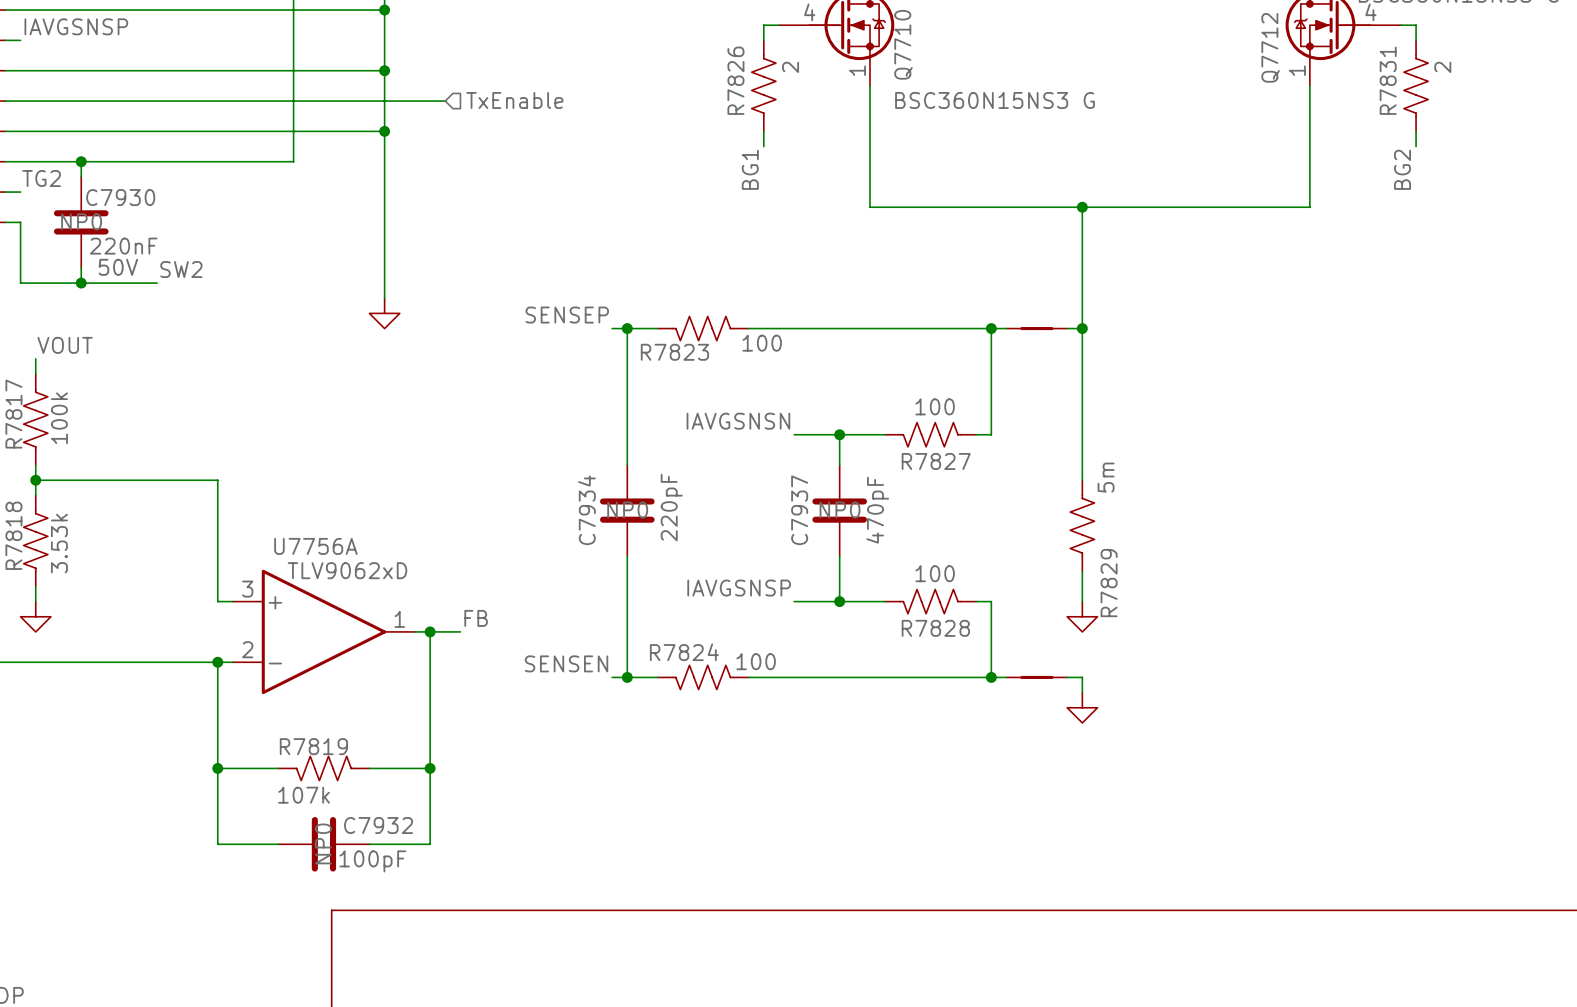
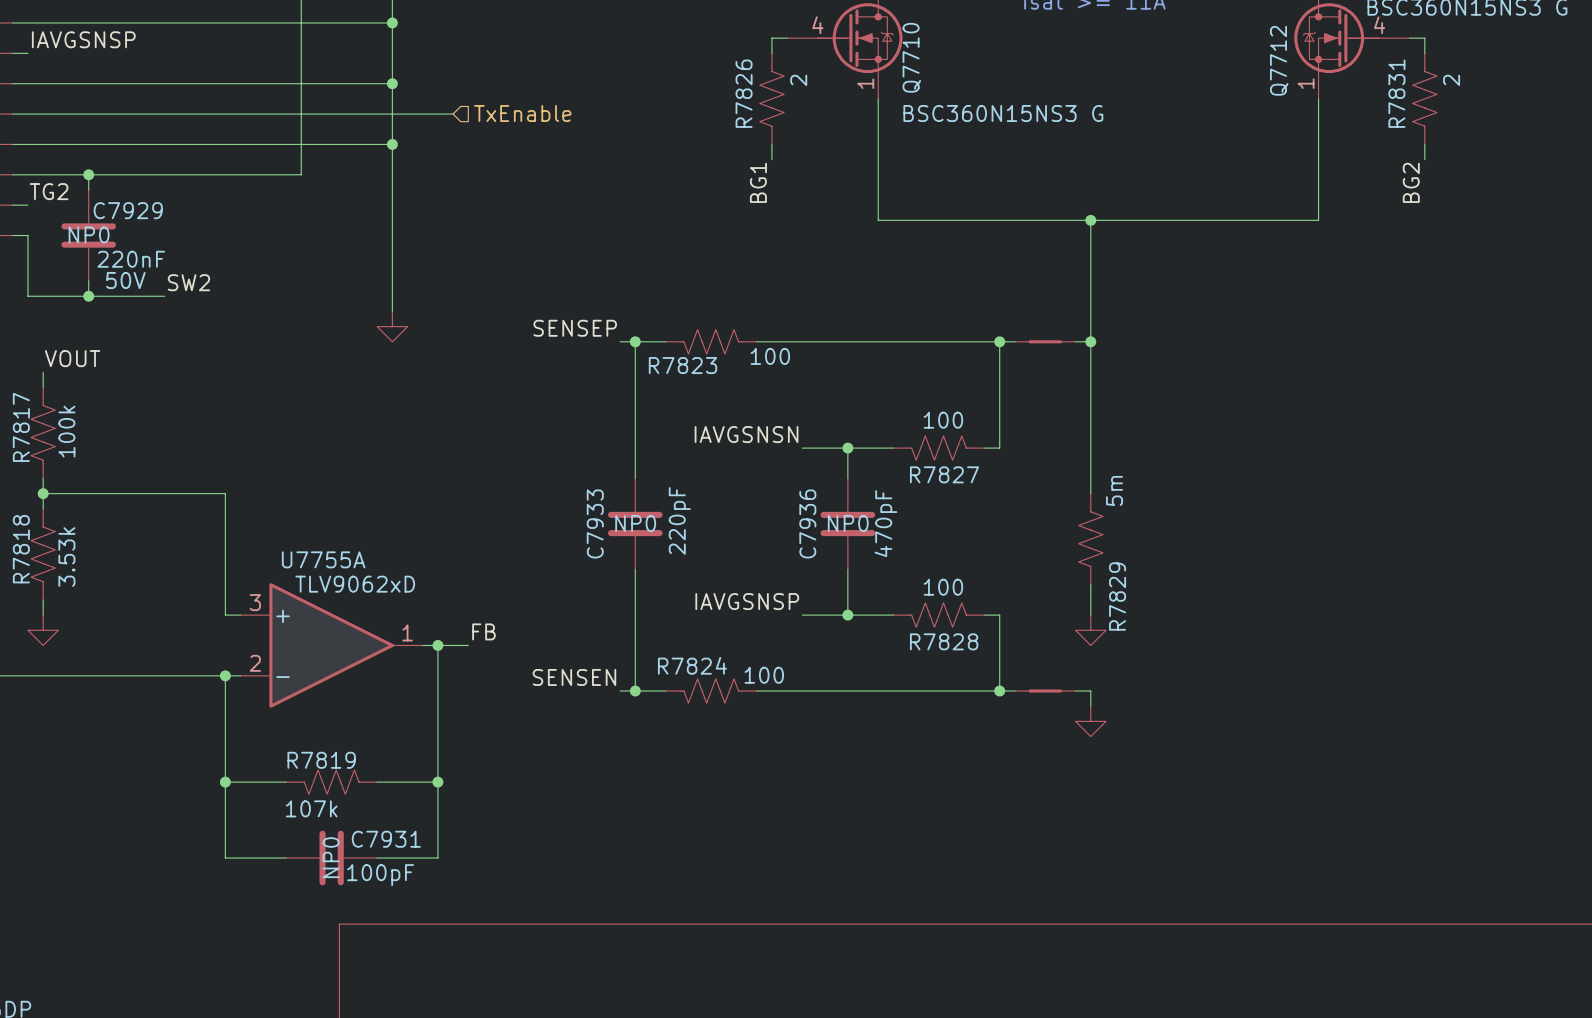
C7930 name: C7930 (120, 197) -> C7929 (128, 210)
C7934 name: C7934 (586, 510) -> C7933 (595, 524)
C7937 name: C7937 (799, 510) -> C7936 (807, 524)
U7756A name: U7756A (315, 546) -> U7755A (323, 559)
C7932 name: C7932 (378, 825) -> C7931 (386, 839)

